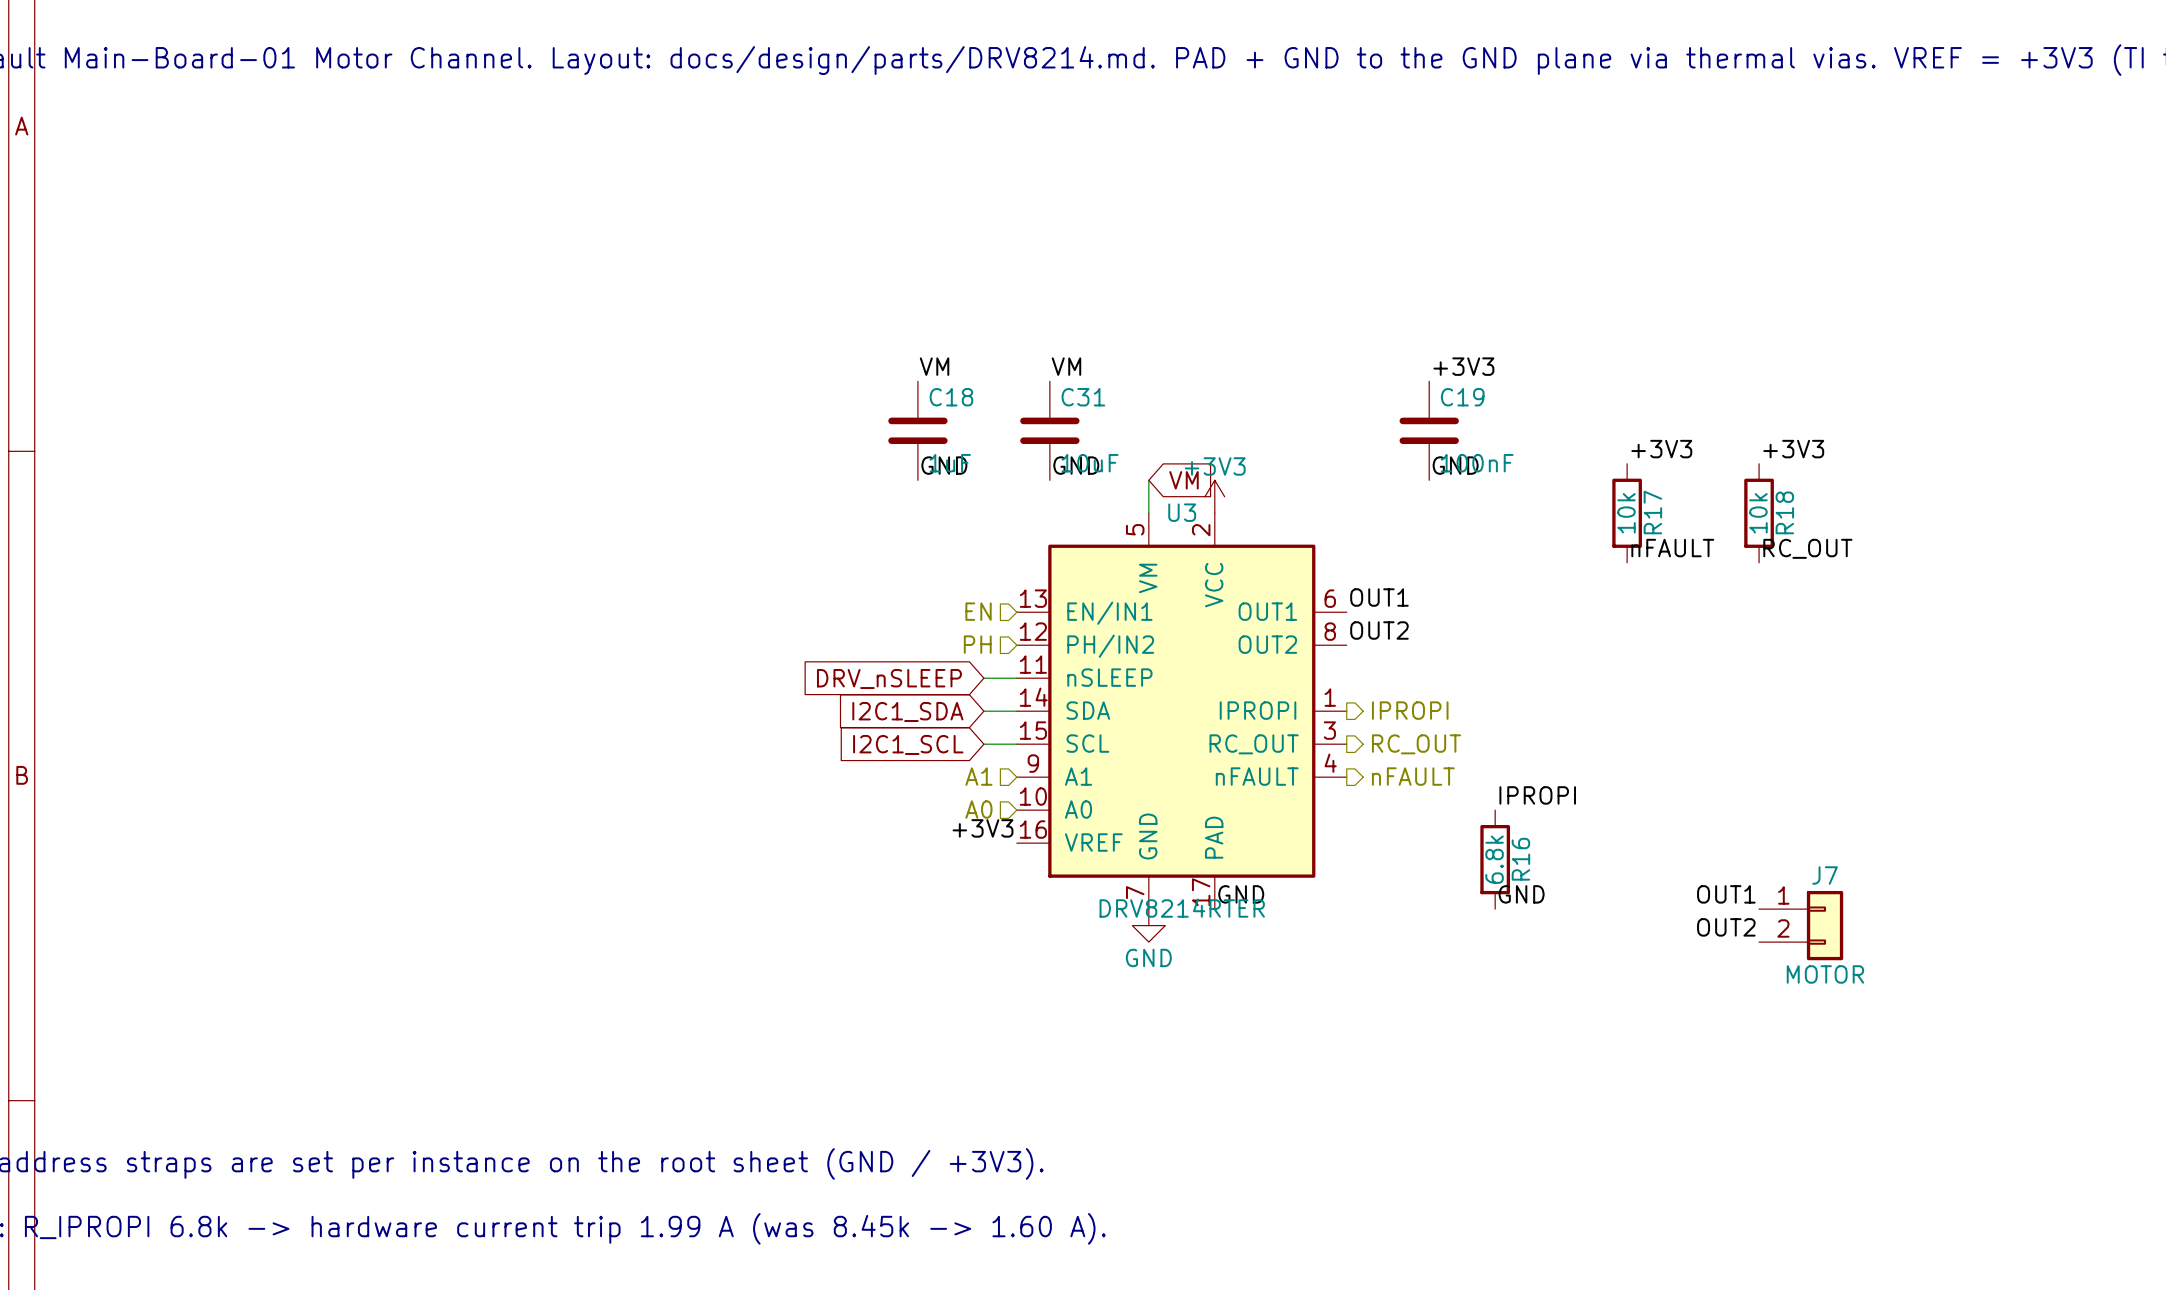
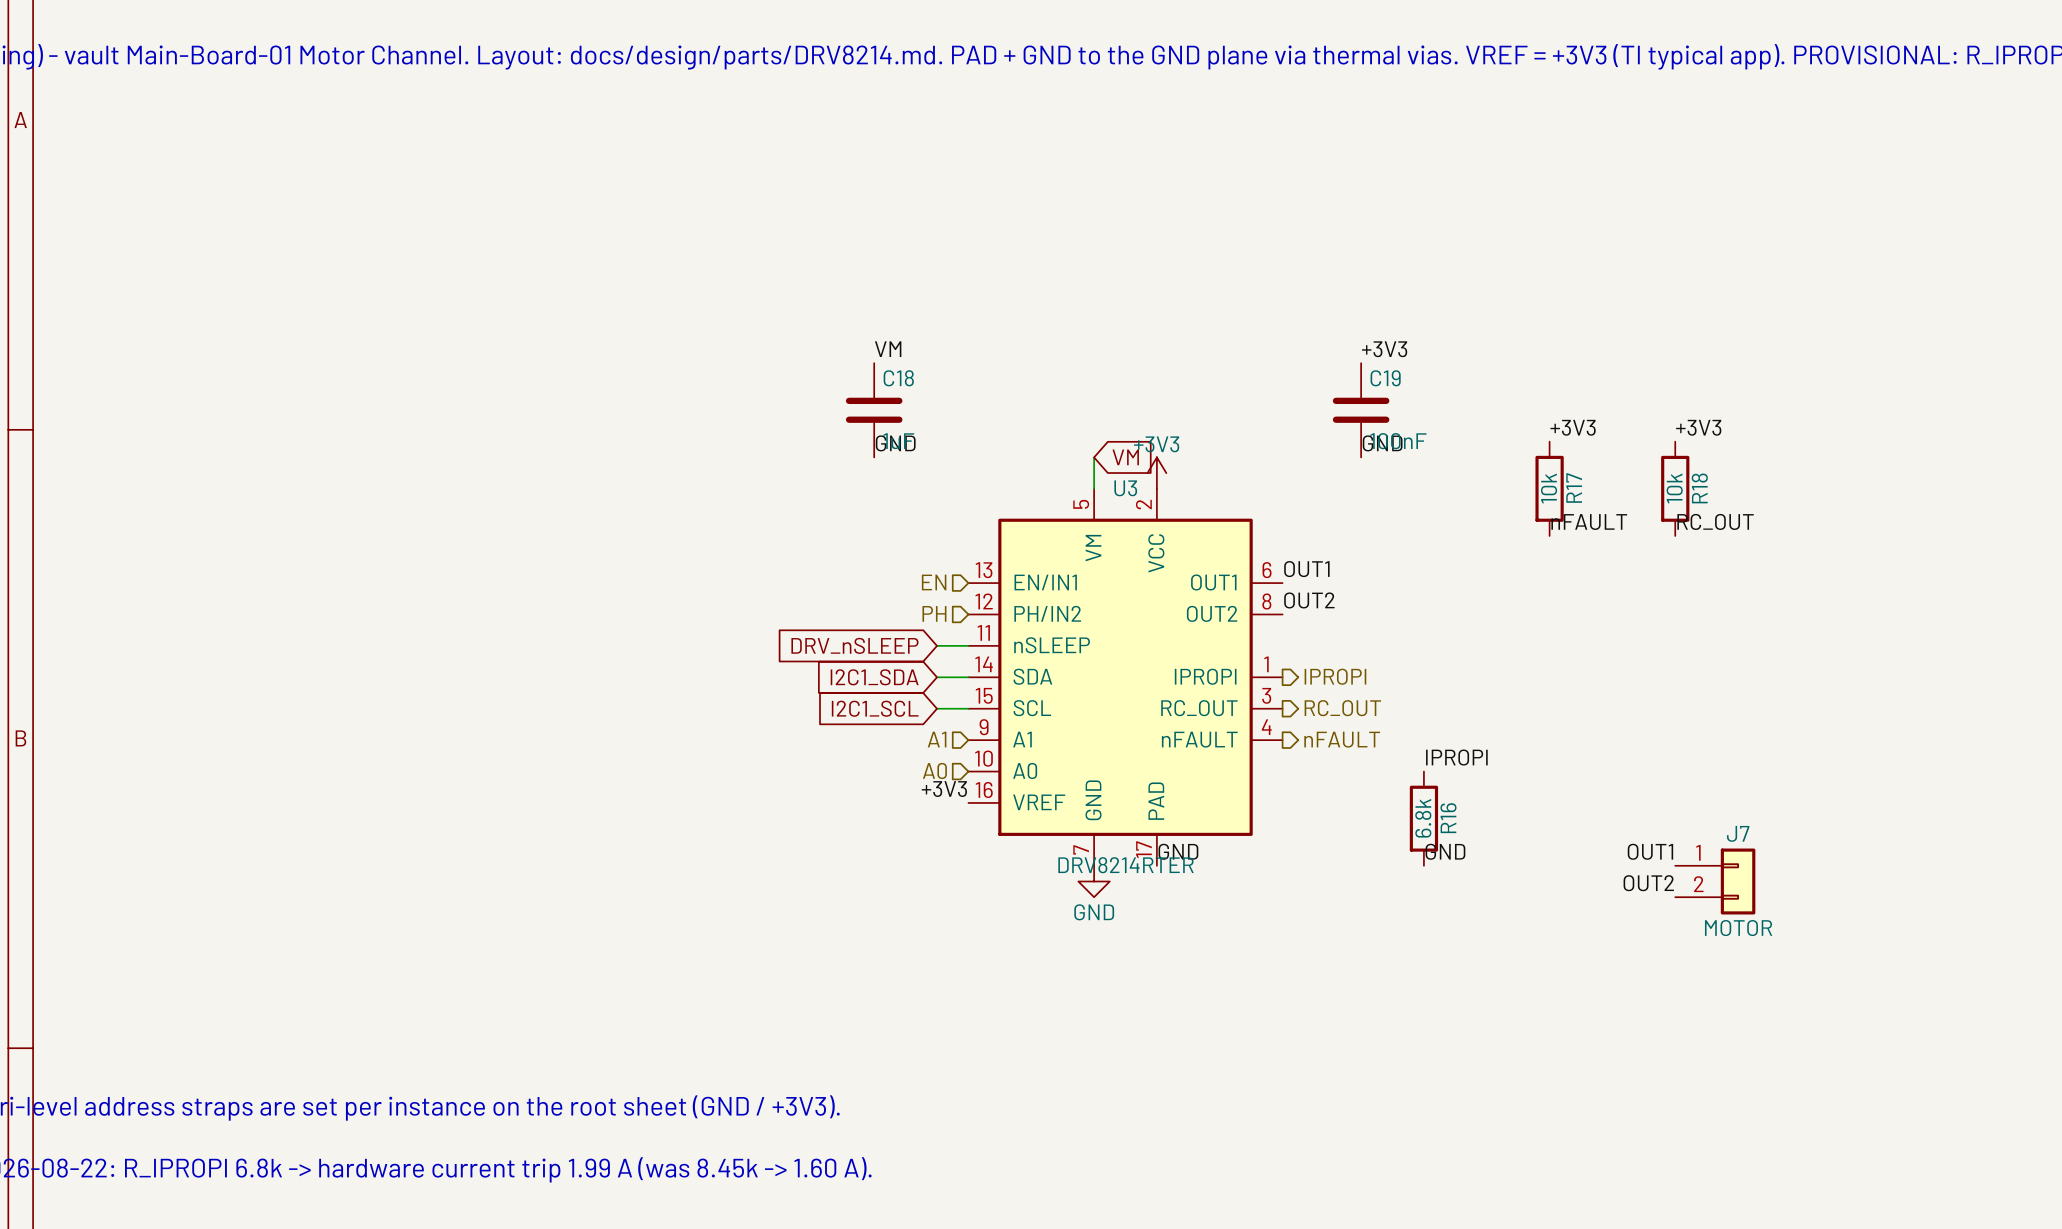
label: VM (1066, 366) -> none
C31: 10uF (1049, 430) -> none
label: GND (1076, 465) -> none

